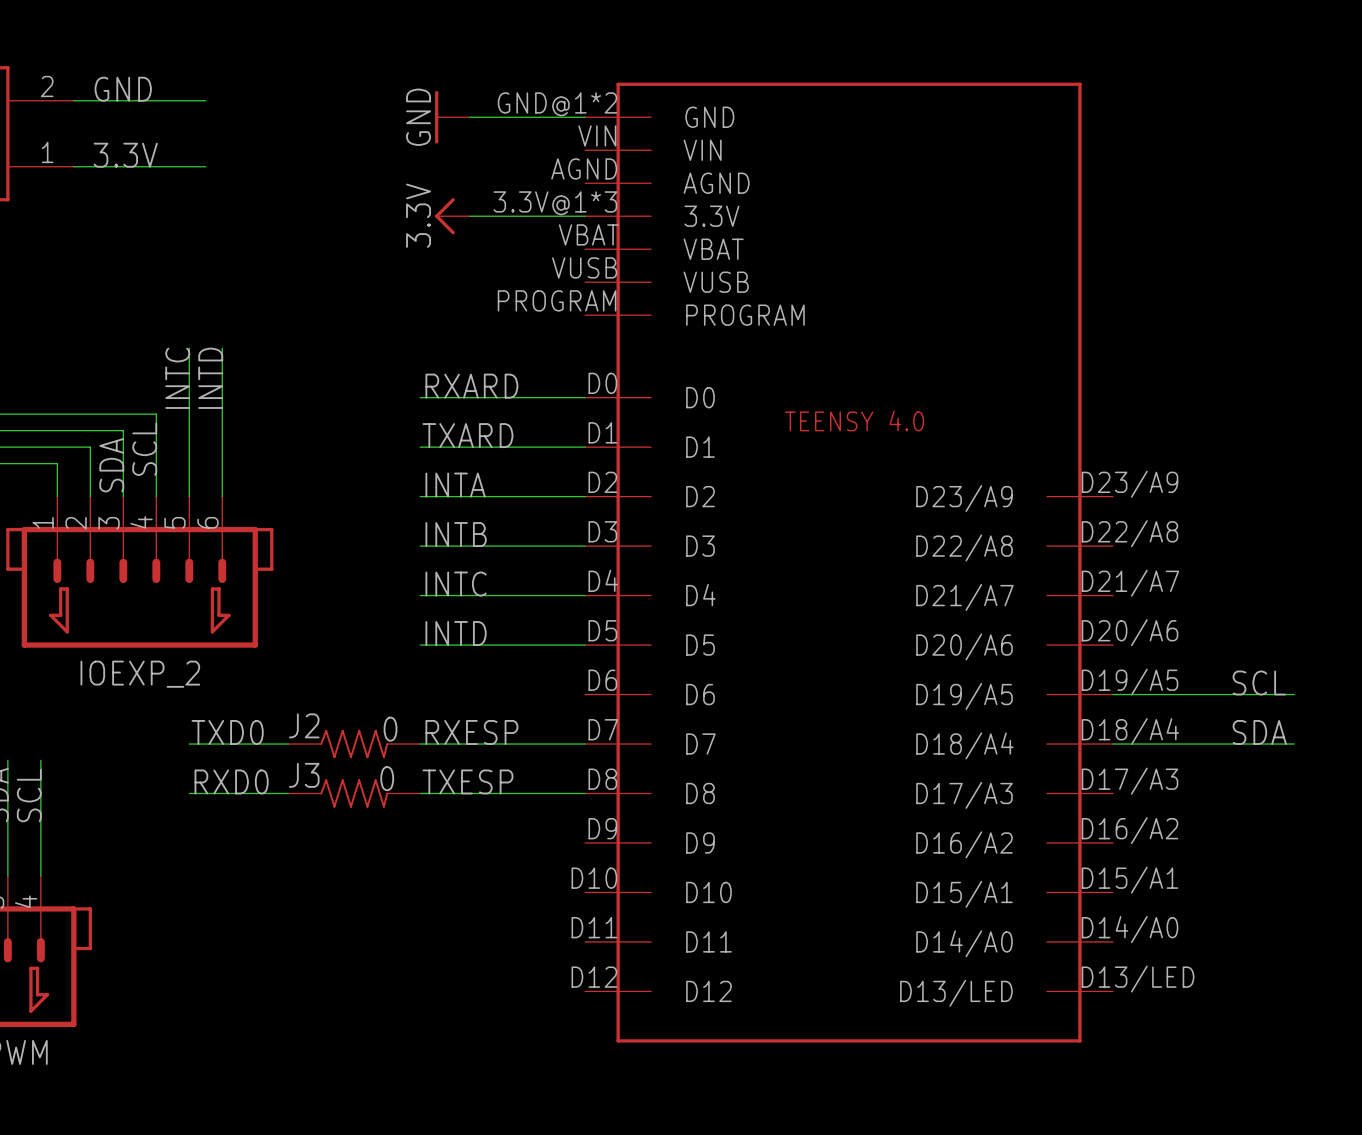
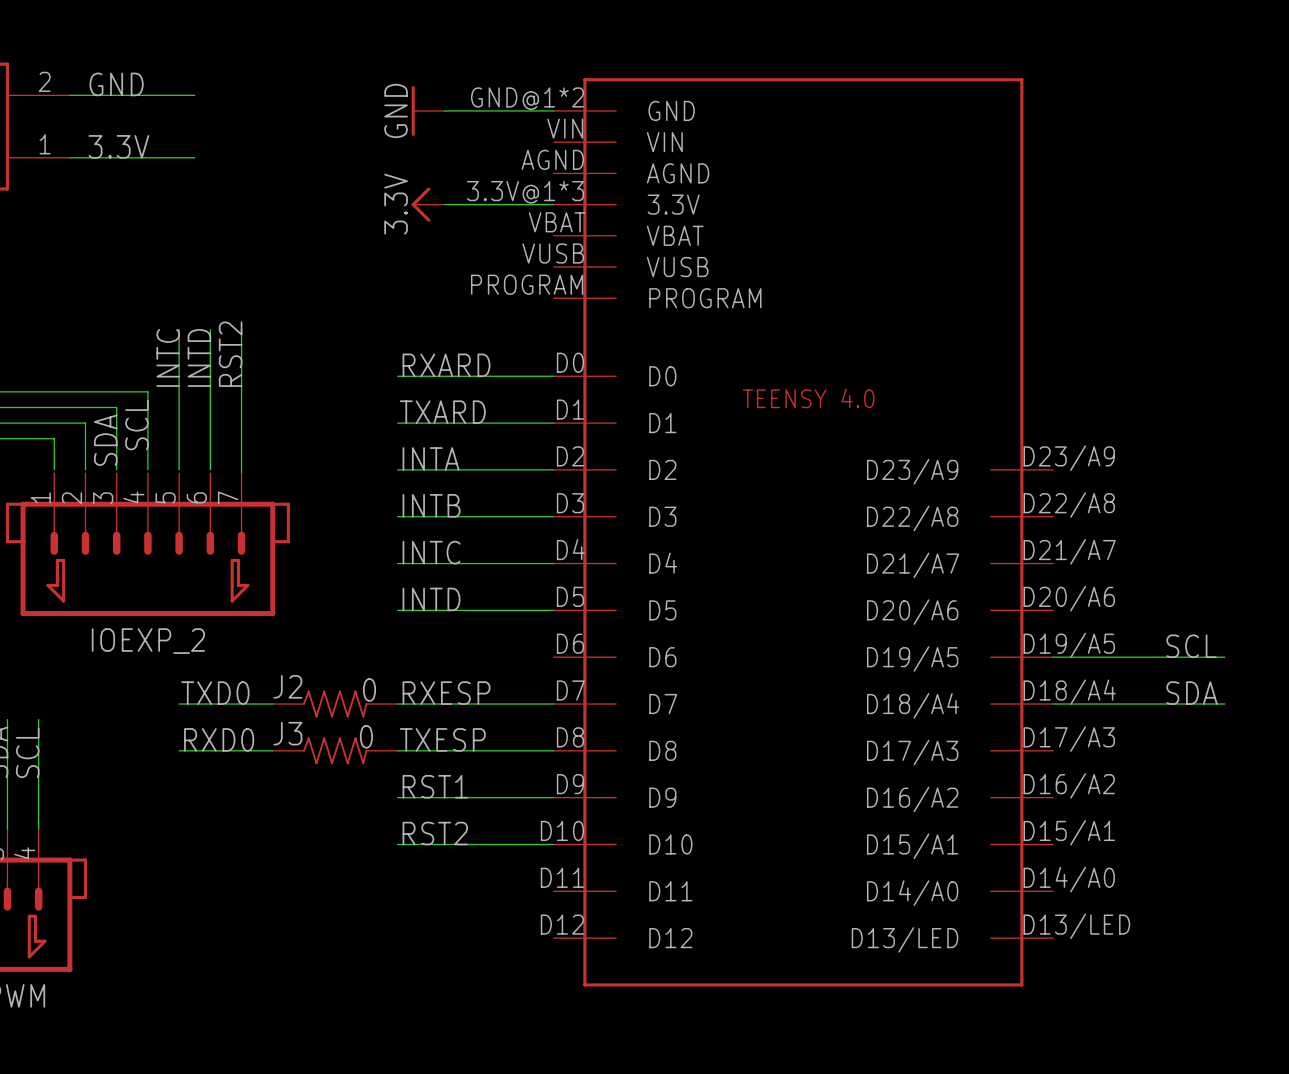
wire: none -> (241, 329) (241, 473)
label: none -> RST2 (230, 354)
IOEXP_2 symbol: [6, 496, 274, 648] -> [5, 473, 290, 616]
label: none -> RST1 (435, 786)
wire: none -> (397, 797) (553, 797)
label: none -> RST2 (435, 833)
wire: none -> (397, 844) (553, 844)

